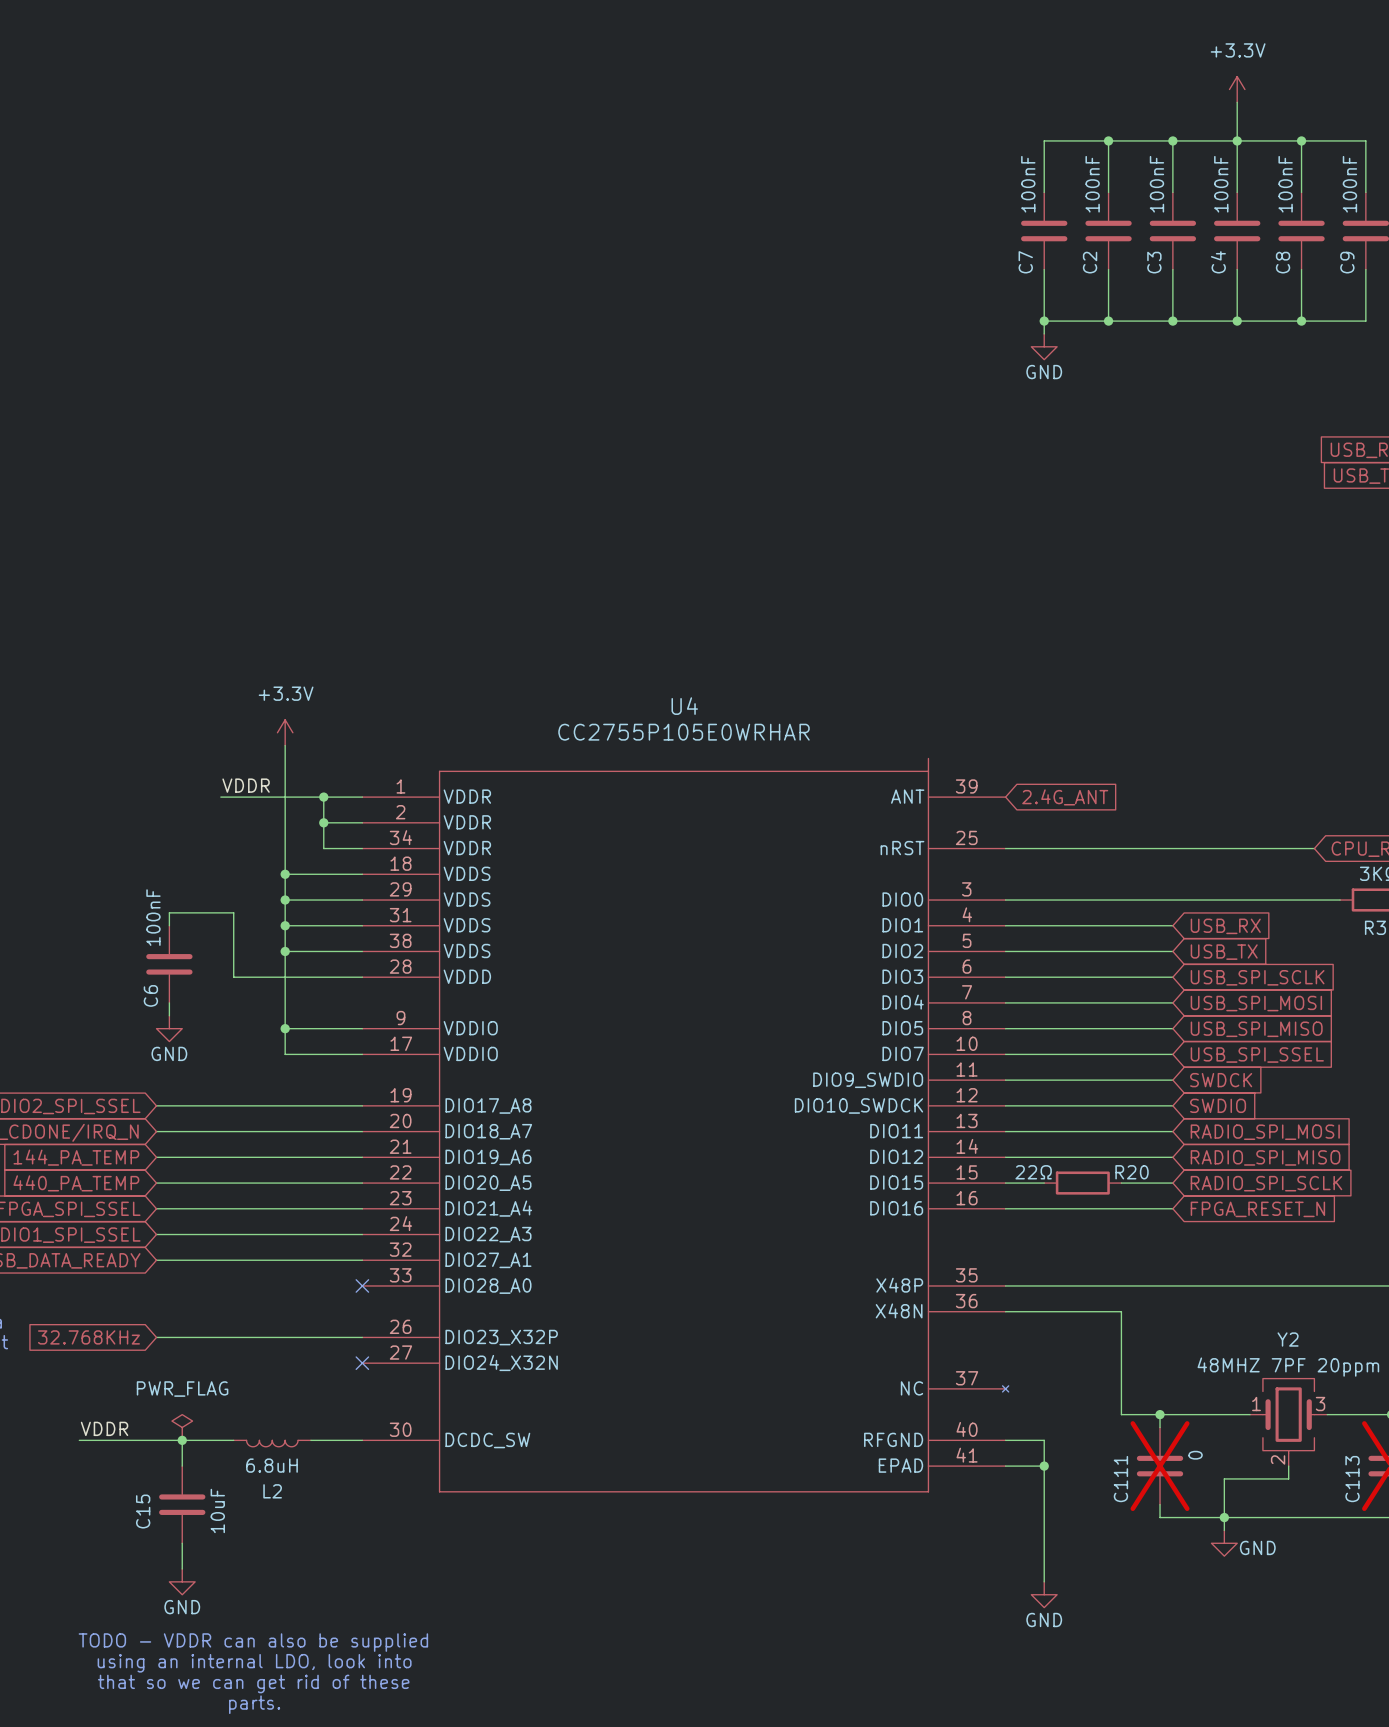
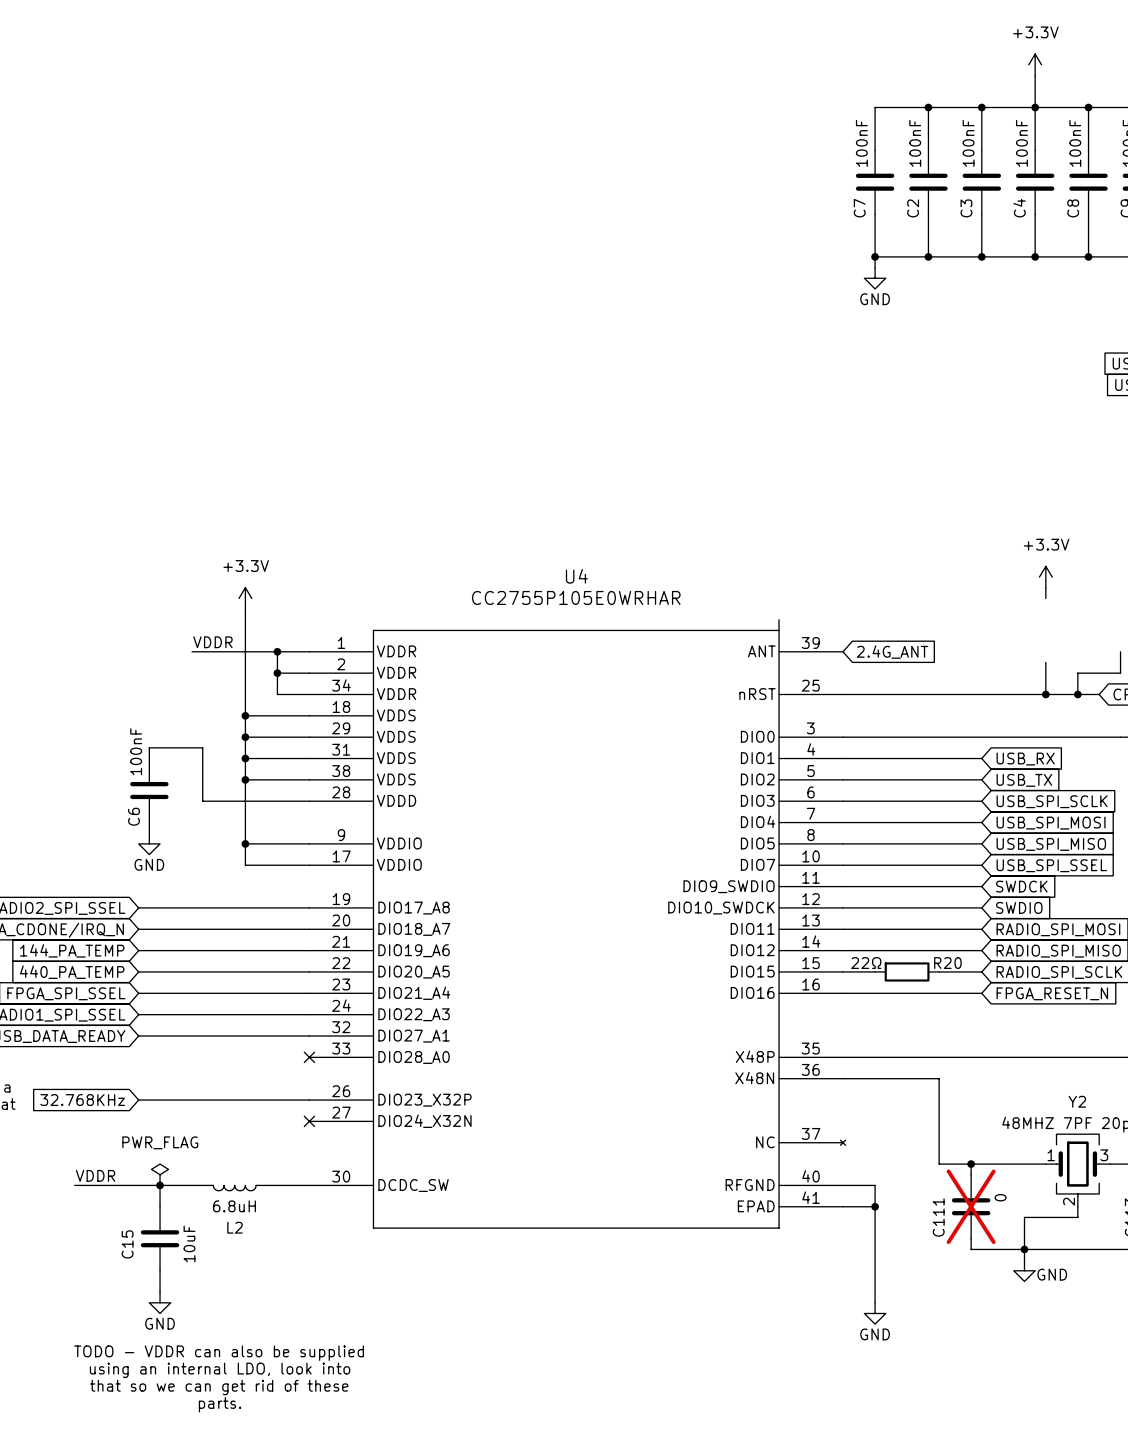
power symbol: none -> +3.3V (1045, 577)
wire: none -> (1045, 587) (1045, 598)
wire: none -> (1120, 651) (1120, 673) (1077, 673) (1077, 694)
wire: none -> (1045, 662) (1045, 694)
junction: none -> (1045, 694)
junction: none -> (1077, 694)

